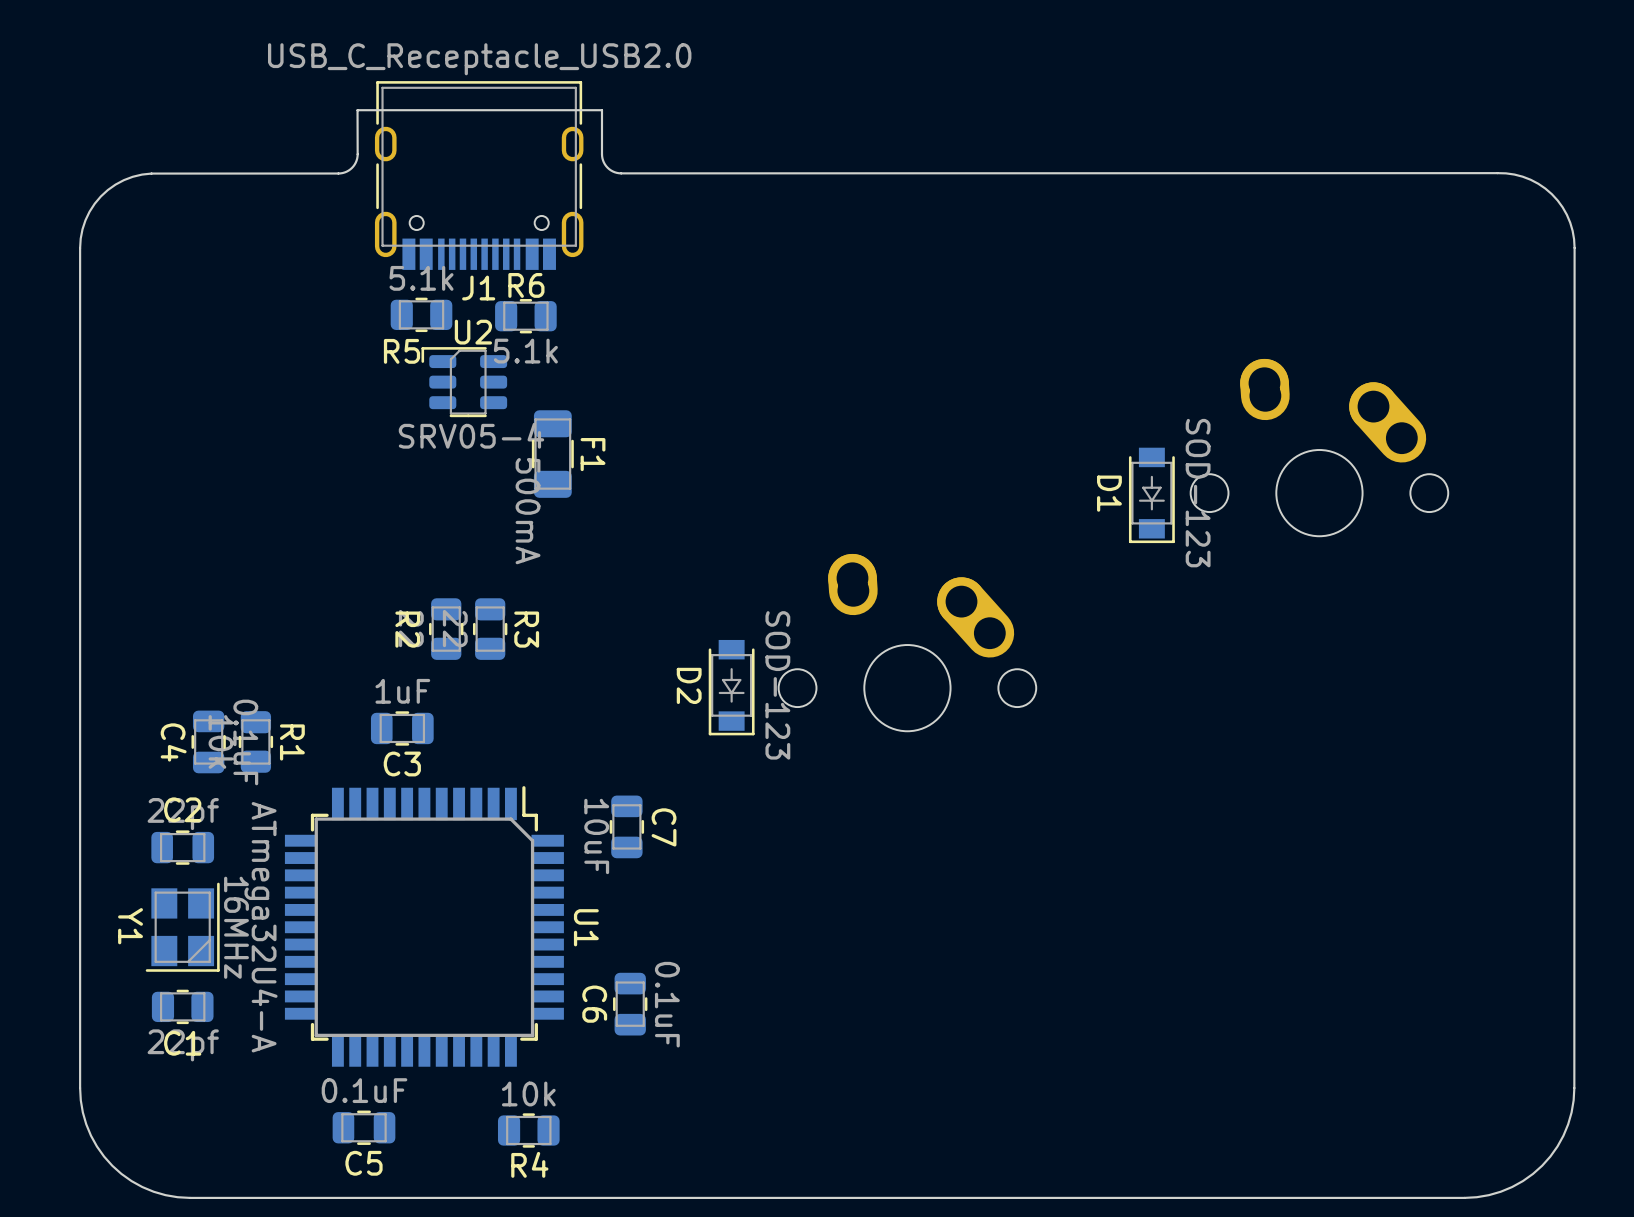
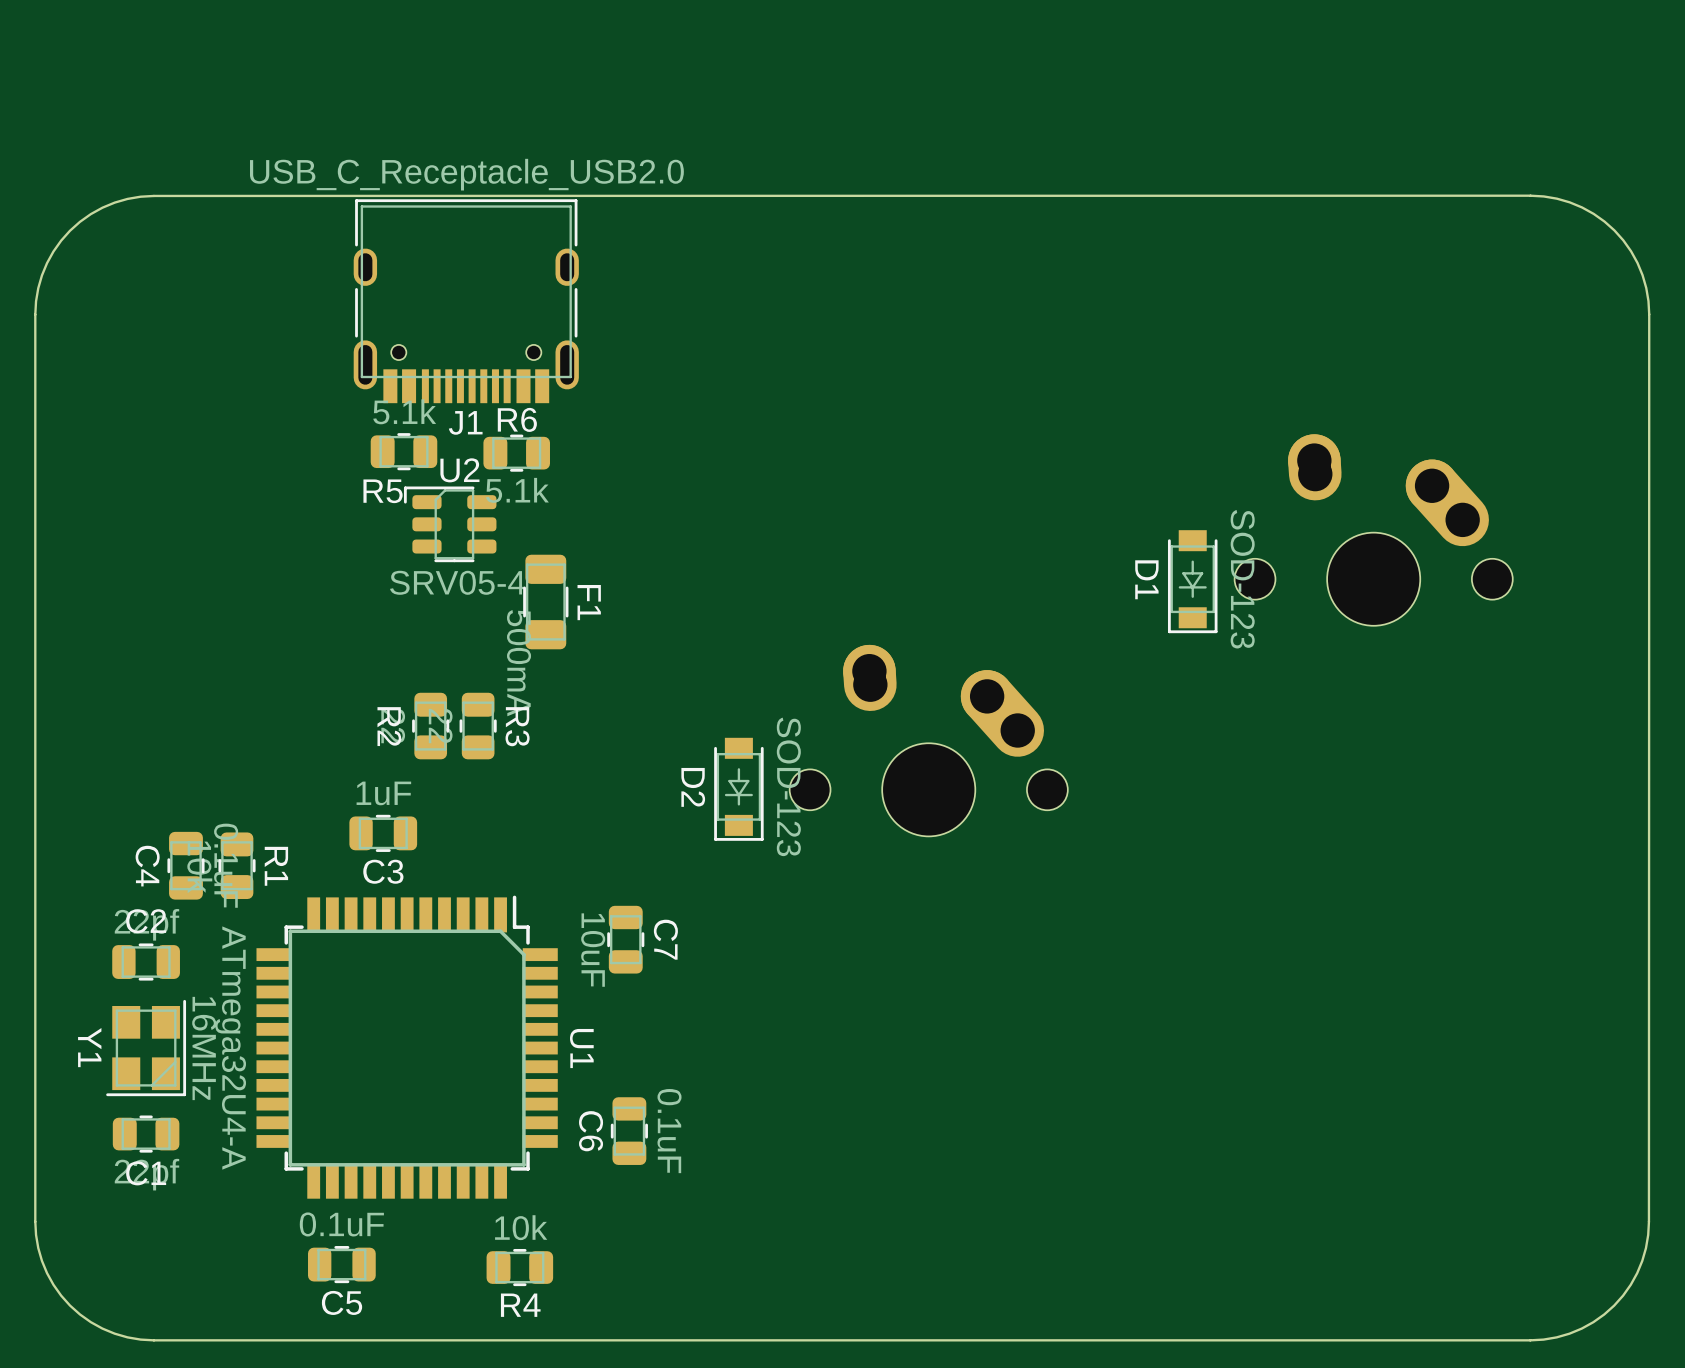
J1 position: (479, 175) -> (466, 301)
board edge: (1574, 247) (1570, 222) (1562, 207) (1551, 194) (1530, 179) (1505, 173) (621, 173) (610, 170) (603, 160) (601, 110) (357, 110) (357, 158) (353, 166) (346, 171) (338, 173) (151, 173) (132, 176) (115, 184) (94, 203) (82, 229) (80, 248) -> (1649, 314) (1646, 287) (1637, 262) (1614, 230) (1593, 213) (1569, 202) (1530, 195) (140, 196) (102, 207) (79, 221) (61, 240) (41, 275) (35, 314)
R5 position: (421, 314) -> (403, 451)
R6 position: (525, 316) -> (516, 453)
U2 position: (464, 382) -> (450, 524)
F1 position: (552, 454) -> (545, 602)
C4 position: (208, 741) -> (185, 865)
R1 position: (255, 741) -> (237, 865)

